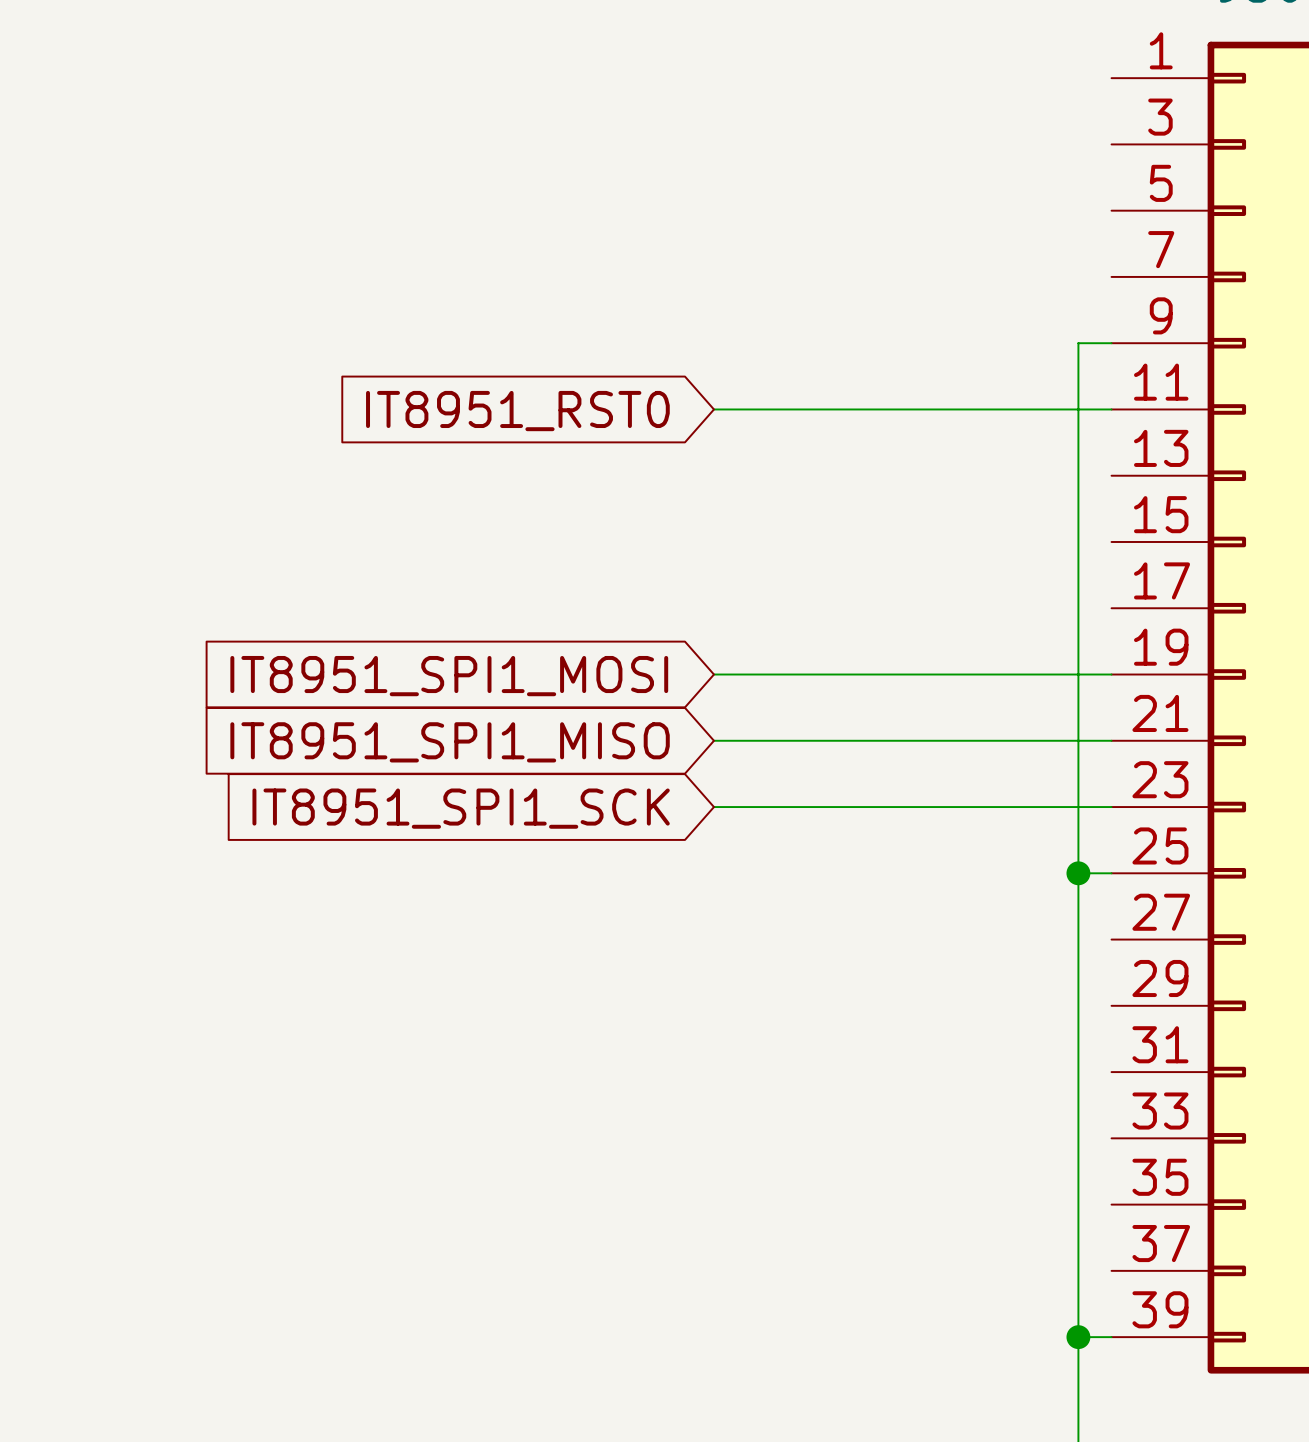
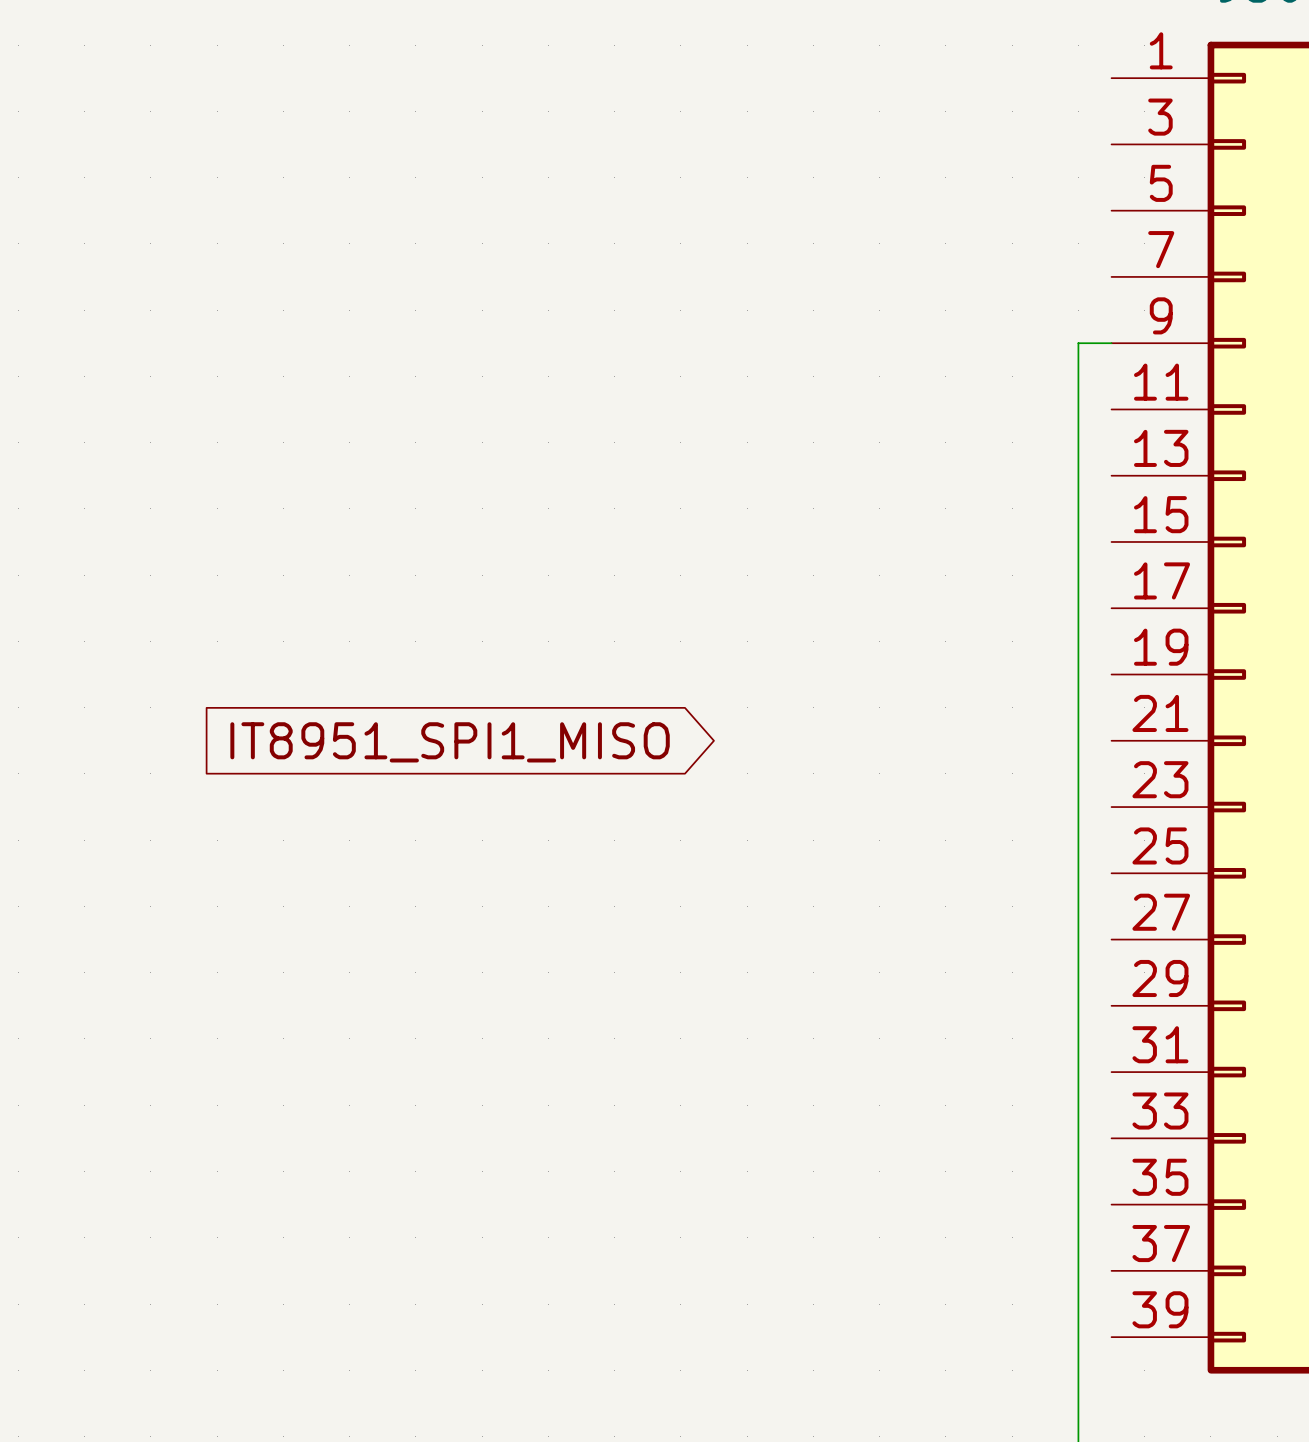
wire: (713, 409) (1111, 409) -> none
global label: IT8951_RST0 (517, 411) -> none
wire: (713, 674) (1111, 674) -> none
global label: IT8951_SPI1_MOSI (449, 676) -> none
wire: (713, 740) (1111, 740) -> none
wire: (713, 807) (1111, 807) -> none
global label: IT8951_SPI1_SCK (461, 808) -> none
wire: (1078, 873) (1111, 873) -> none
junction: (1078, 873) -> none
wire: (1078, 1337) (1111, 1337) -> none
junction: (1078, 1337) -> none

